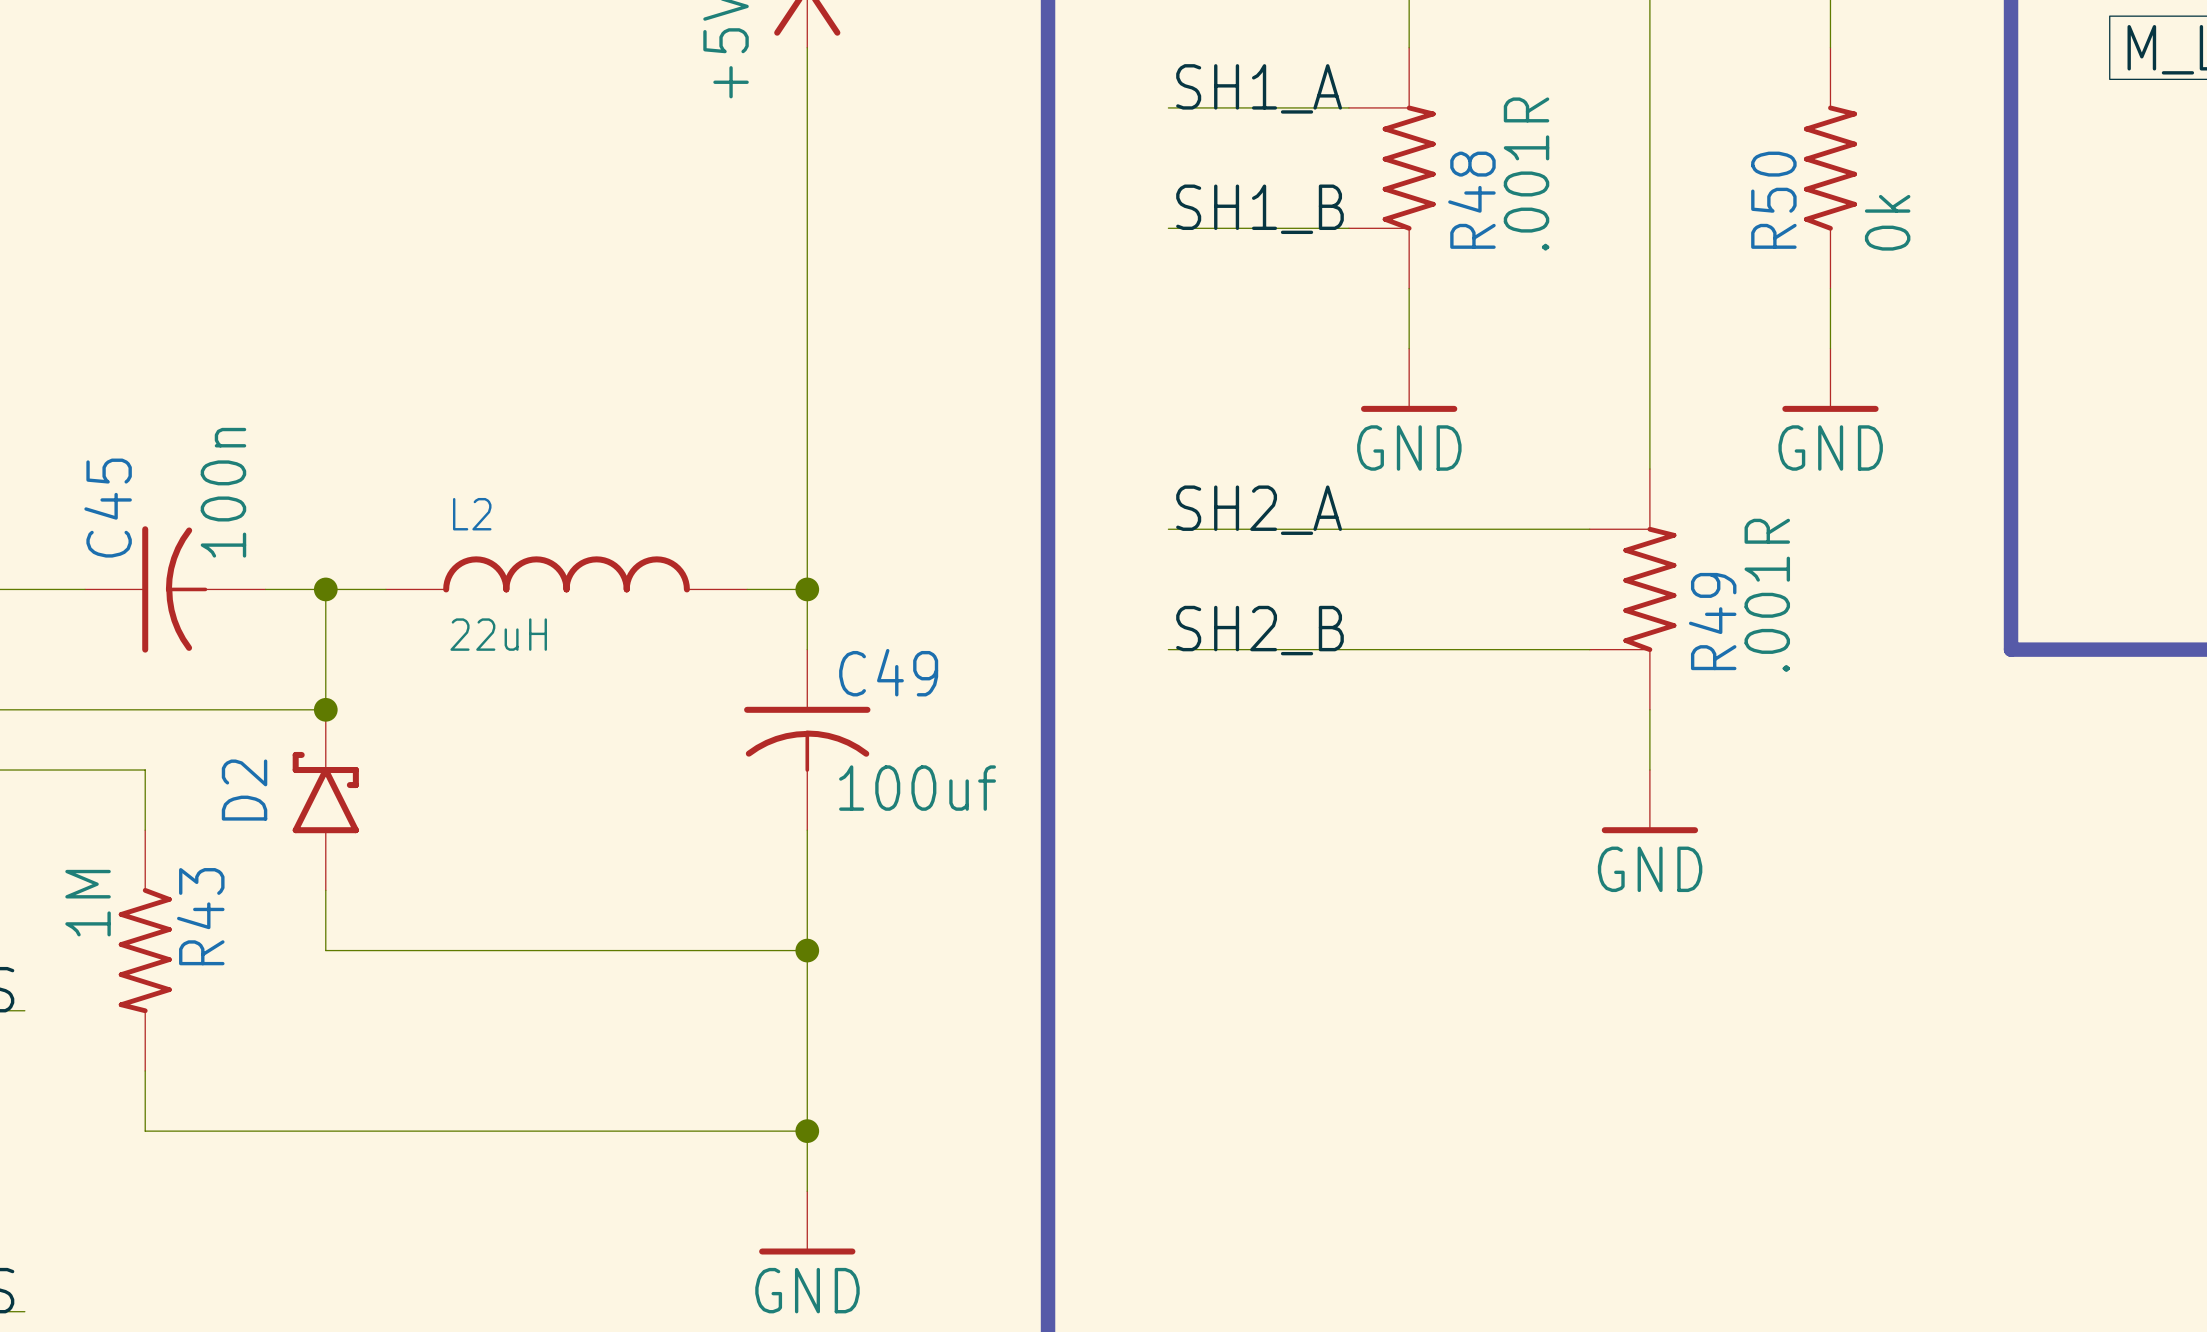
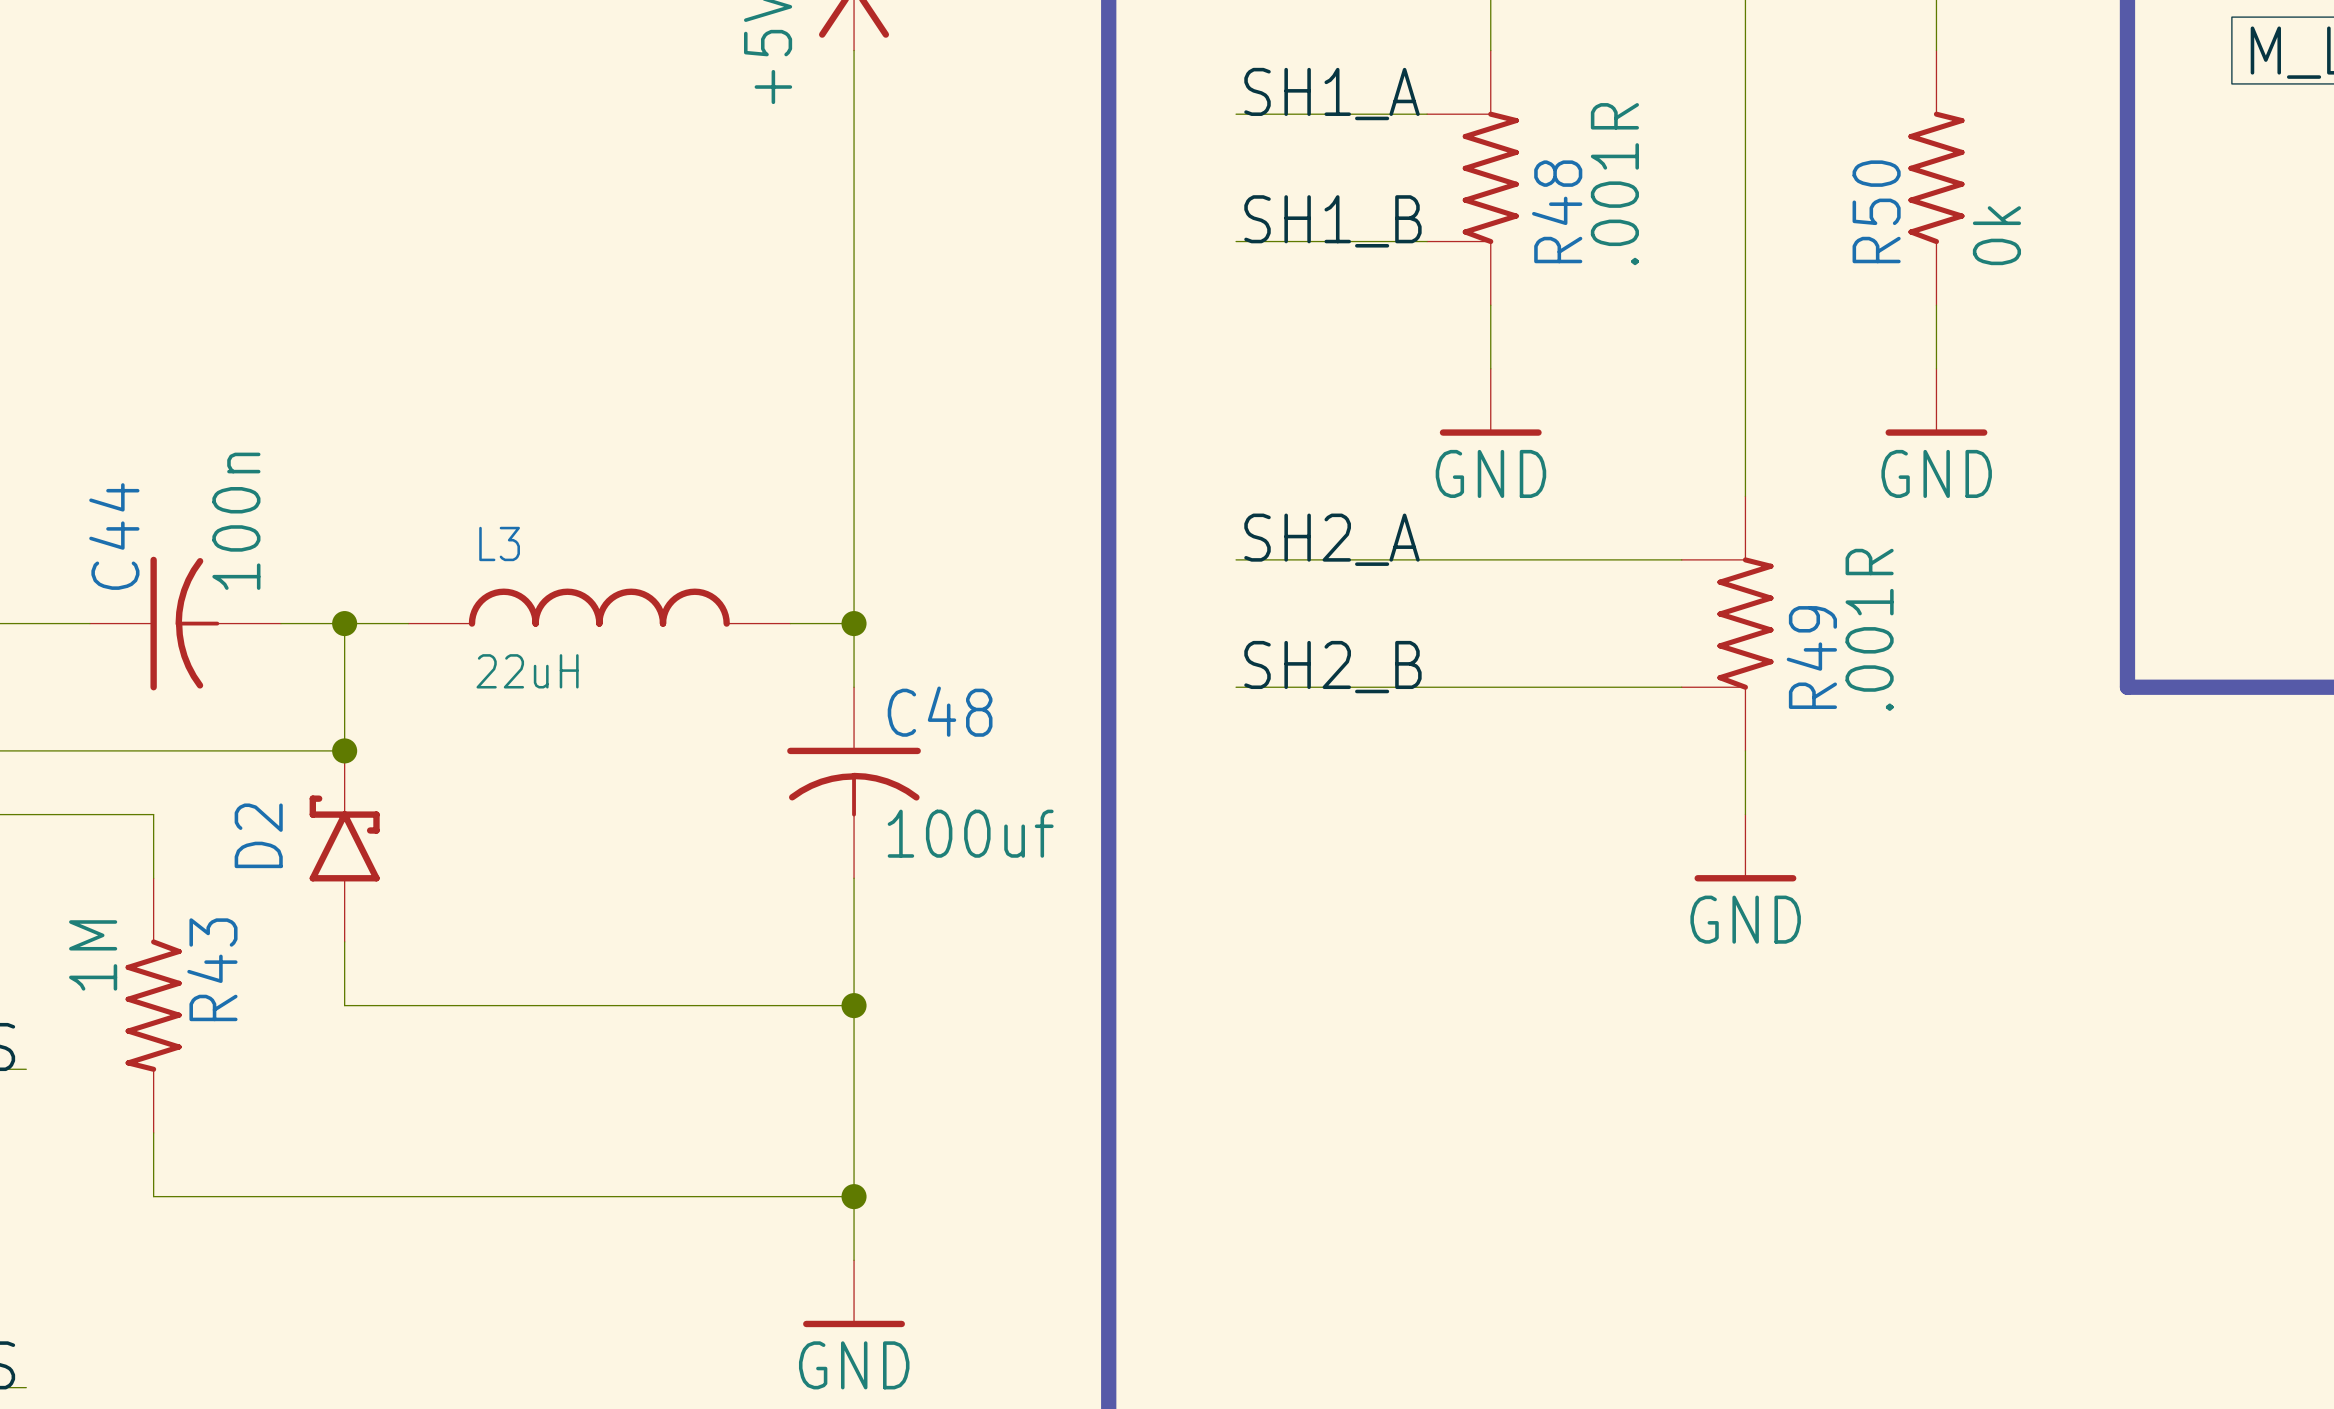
C45 name: C45 (108, 508) -> C44 (114, 536)
L2 name: L2 (472, 514) -> L3 (499, 543)
C49 name: C49 (888, 672) -> C48 (940, 711)

